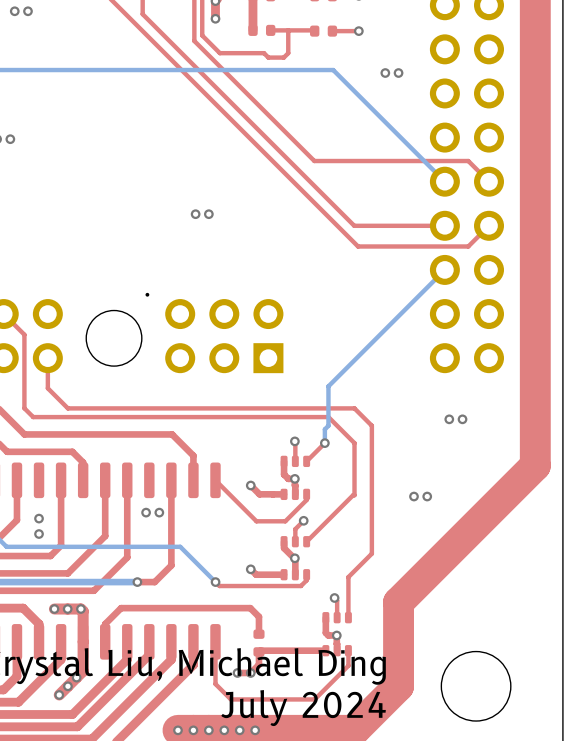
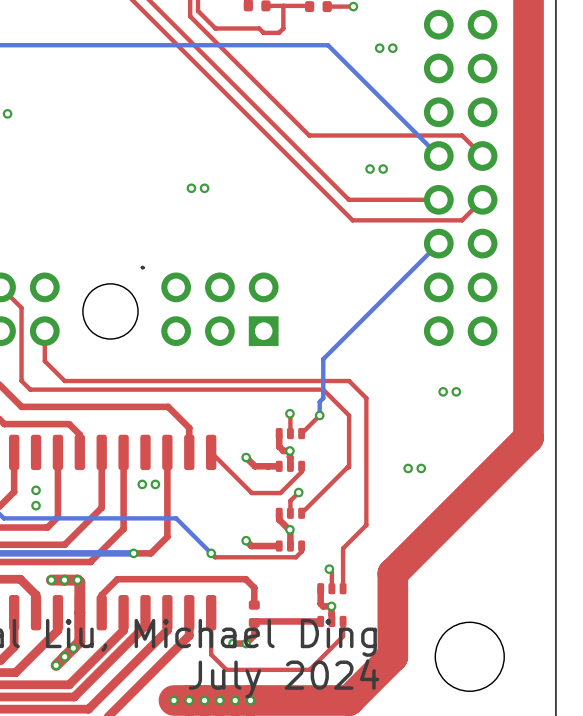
via: none -> (370, 169)
via: none -> (383, 169)

